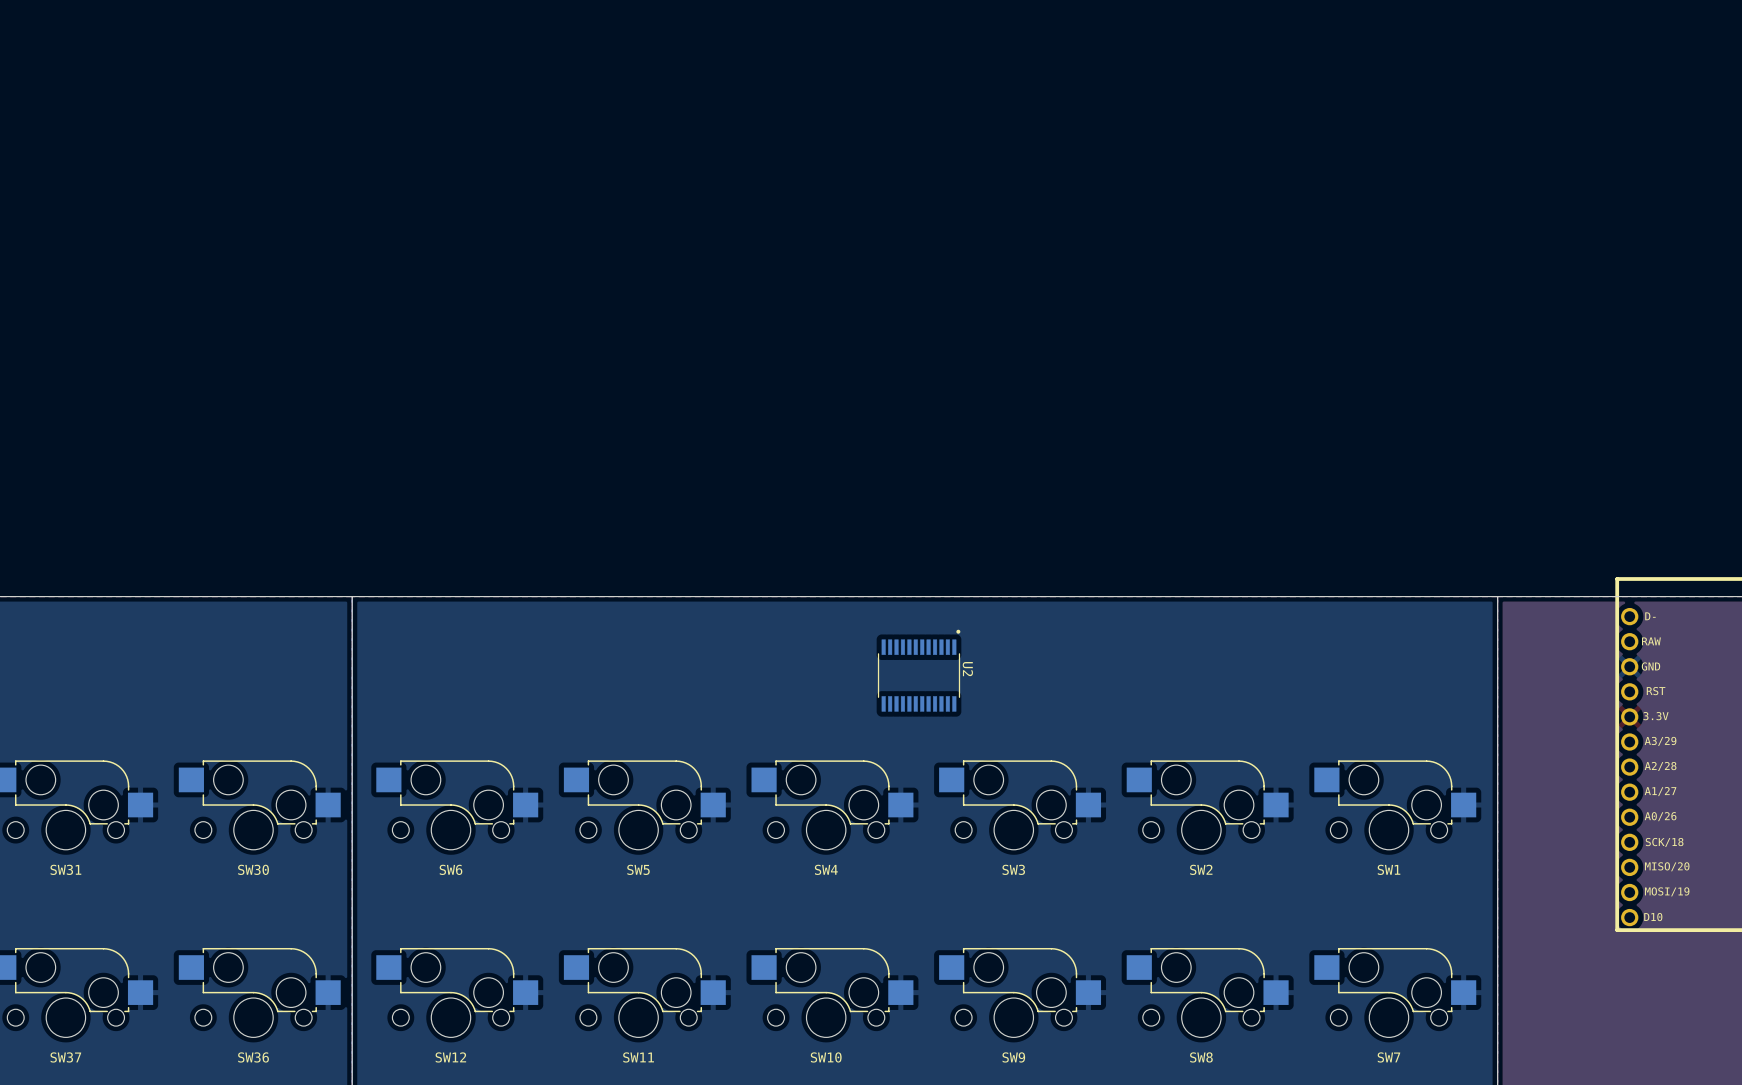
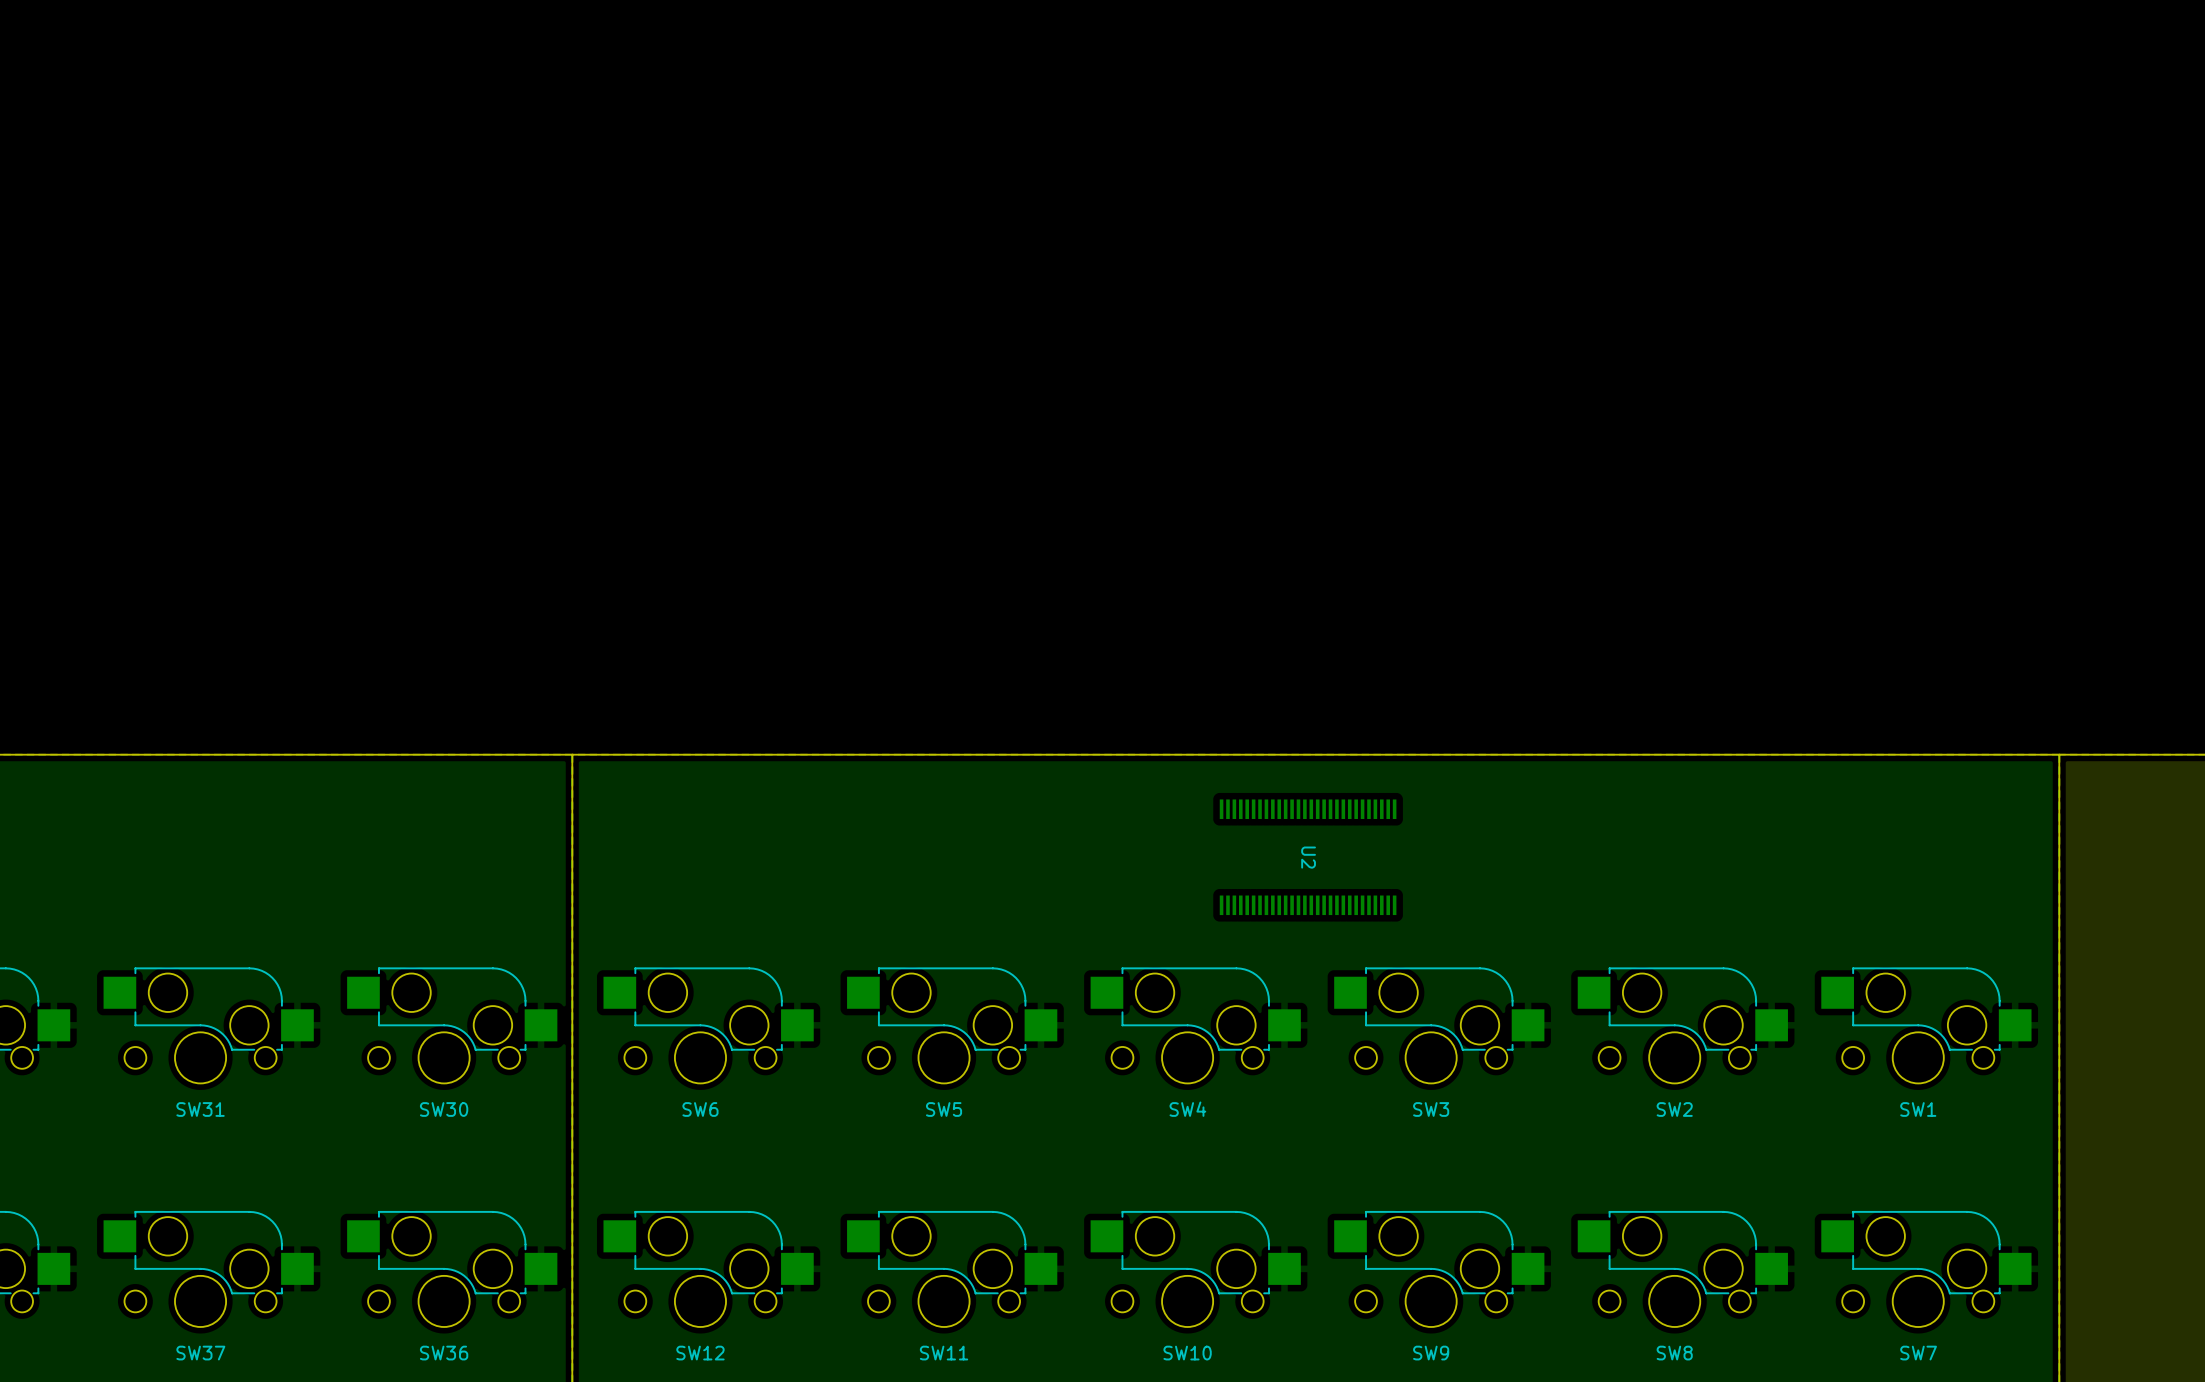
U2 footprint: [877, 629, 961, 712] -> [1219, 799, 1397, 916]
U2 name position: U2 (967, 669) -> U2 (1308, 857)

